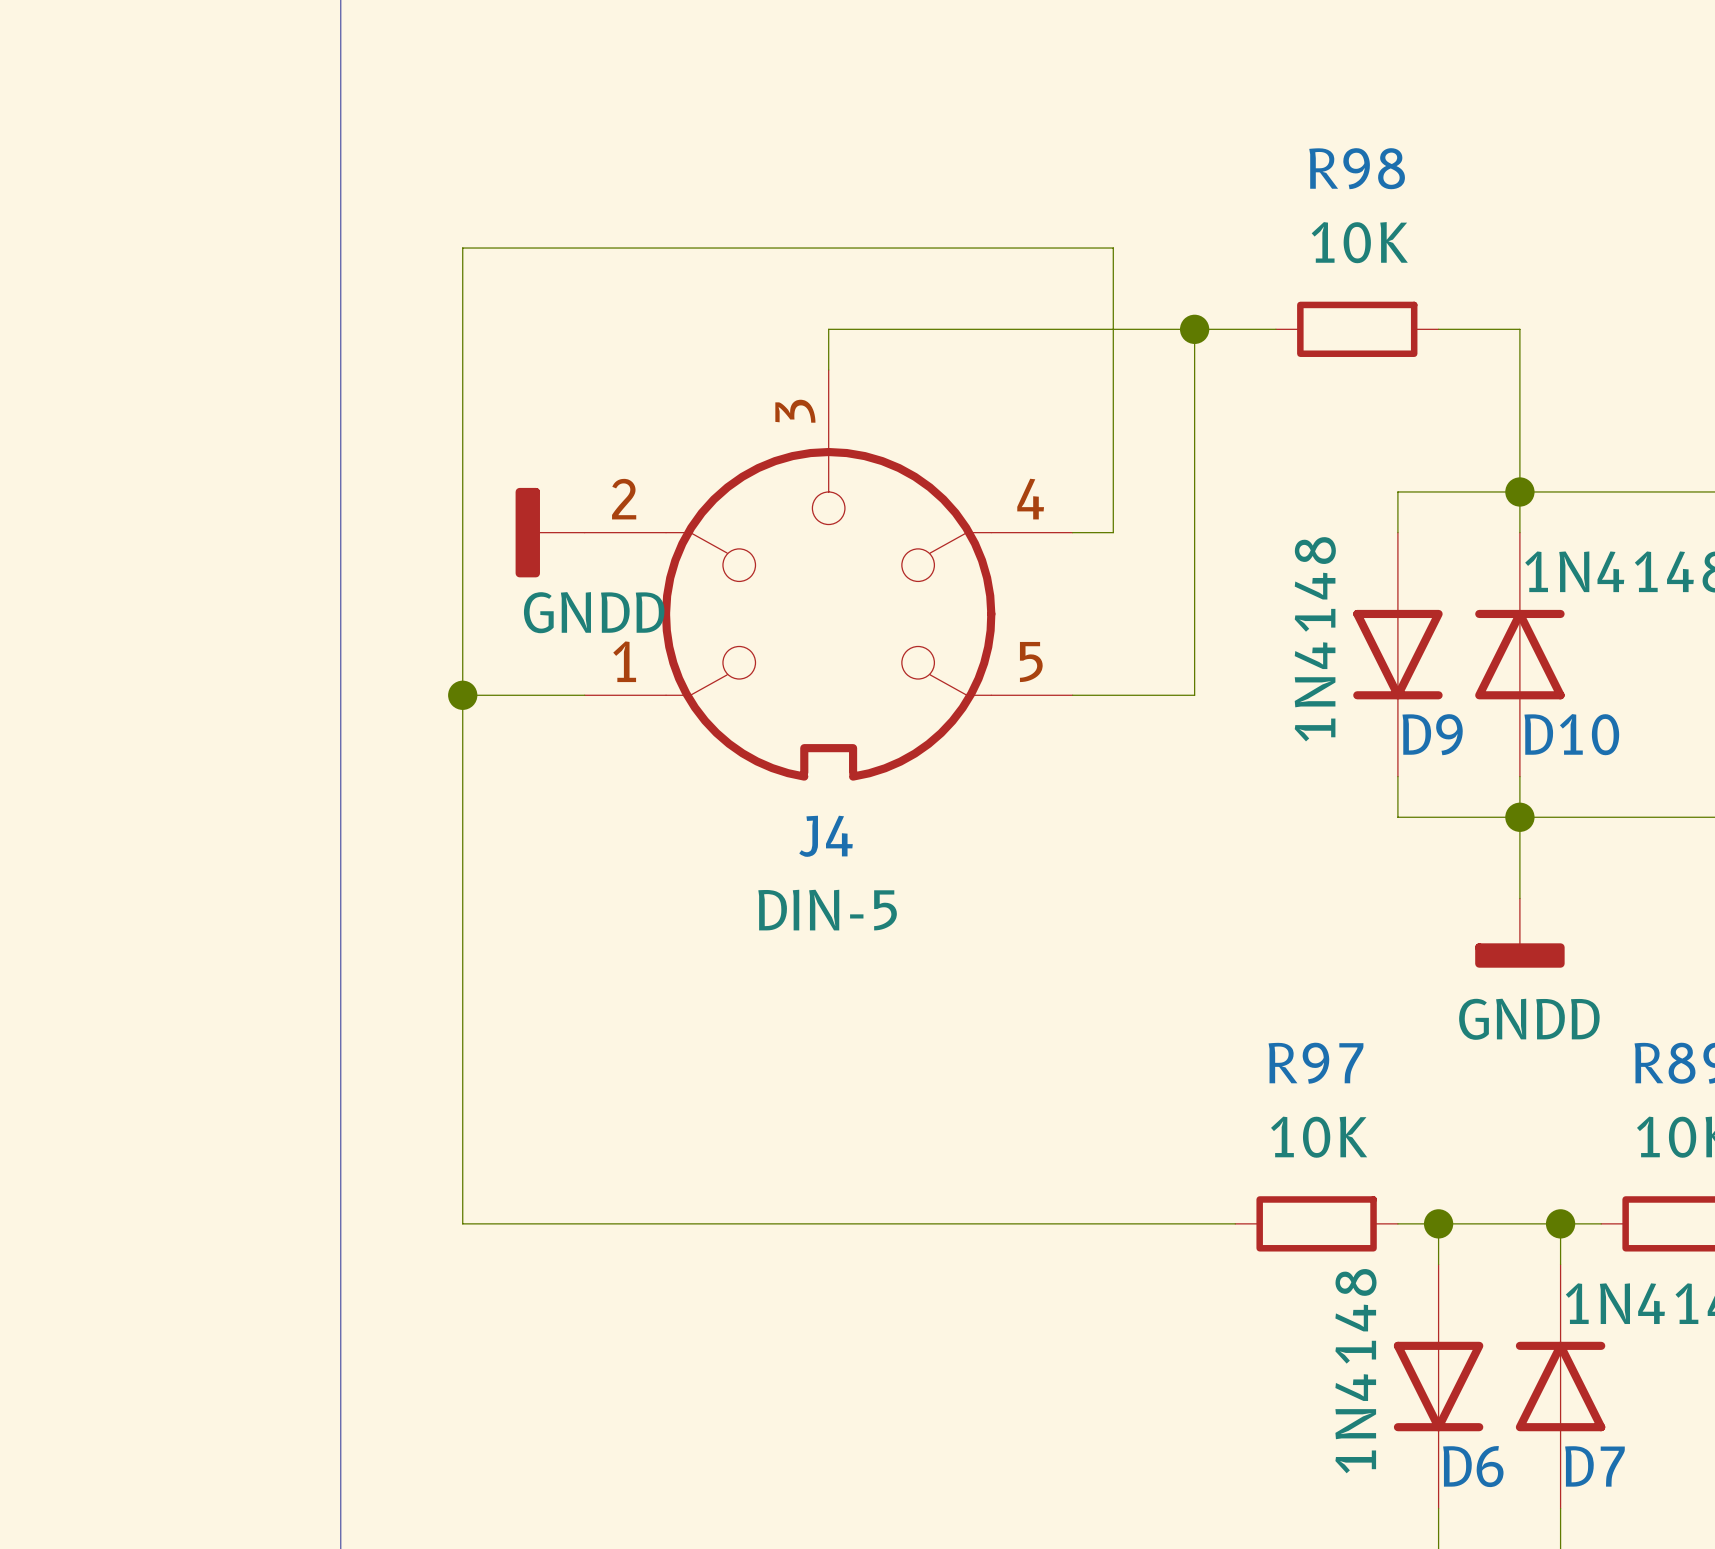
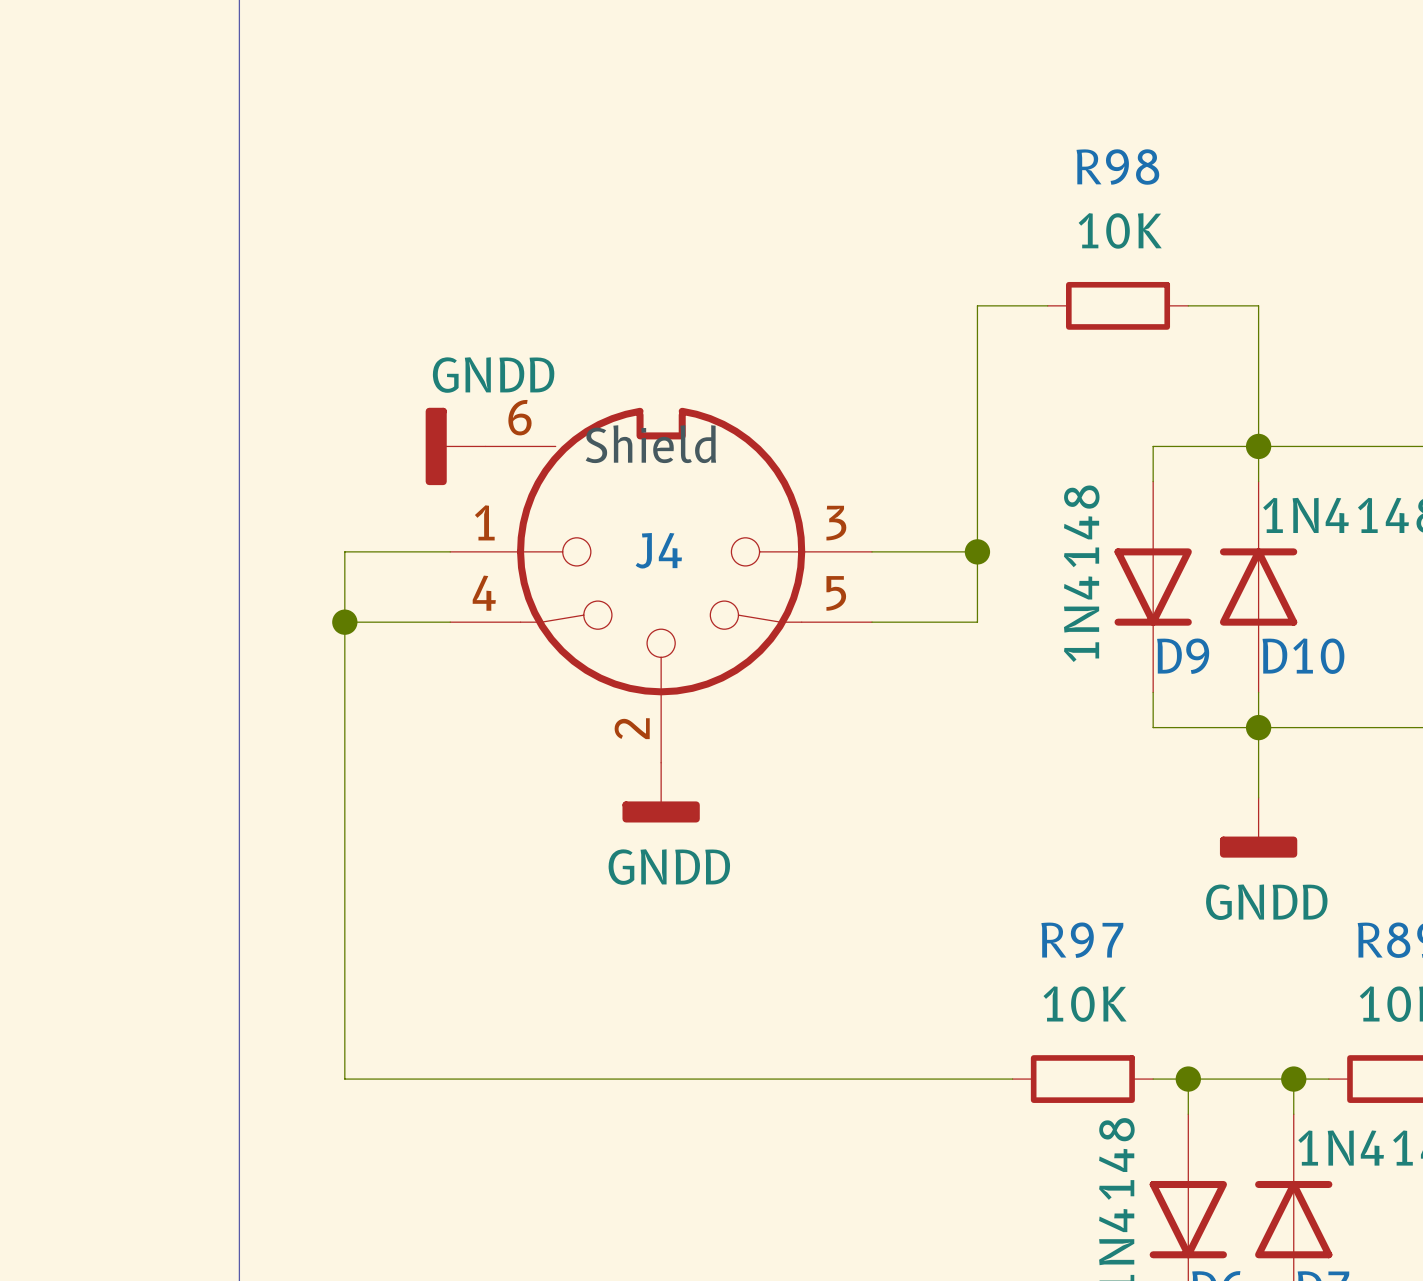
wire: (1194, 329) (828, 329) (828, 370) -> none
junction: (1194, 329) -> none
J4 symbol: [584, 370, 1073, 781] -> [450, 407, 873, 763]
power symbol position: GNDD (550, 532) -> GNDD (455, 446)
wire: (1072, 532) (1113, 532) (1113, 248) (462, 248) (462, 613) -> (450, 551) (344, 551)
power symbol text position: GNDD (594, 612) -> GNDD (493, 375)
wire: none -> (872, 551) (977, 551)
junction: none -> (977, 551)
J4 name position: J4 (826, 836) -> J4 (658, 550)
power symbol: none -> GNDD (661, 792)
J4 value: DIN-5 (827, 910) -> none

